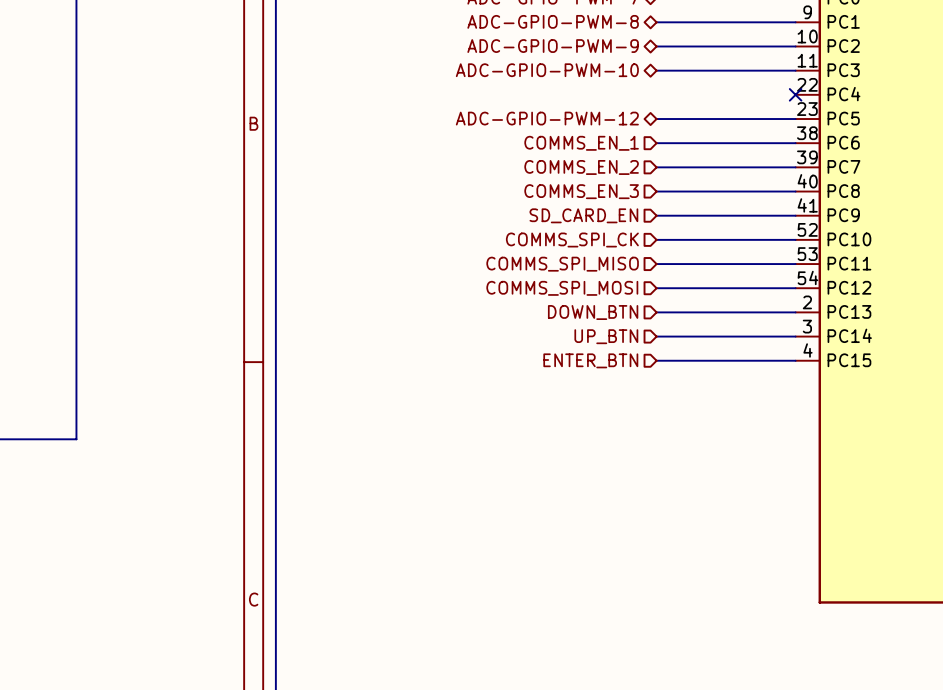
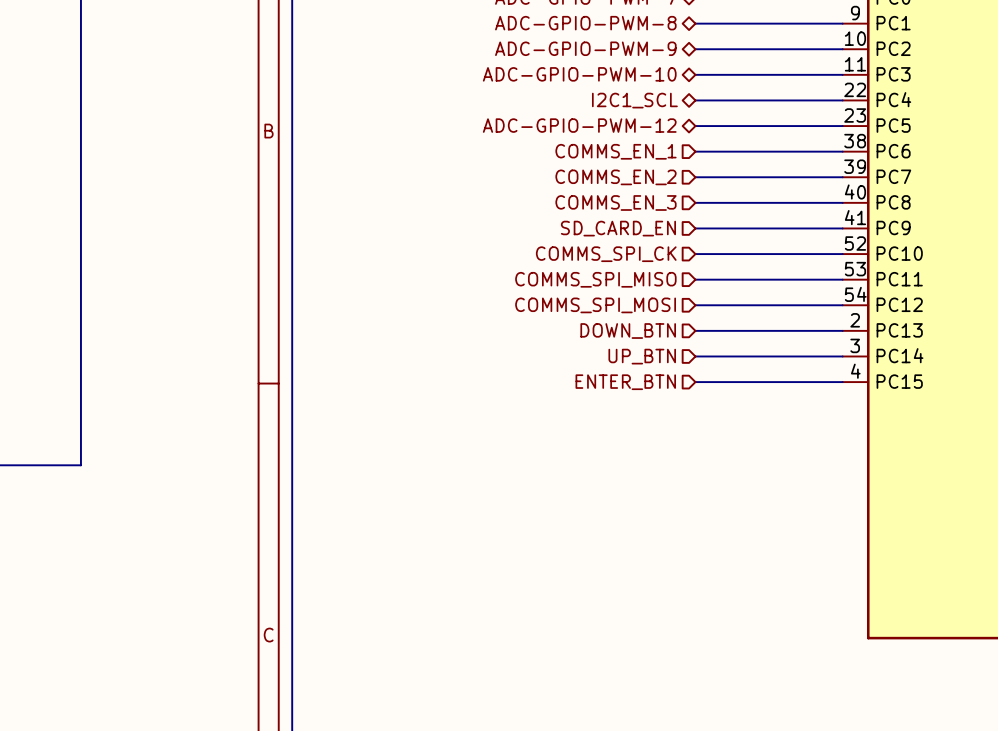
hierarchical label: none -> I2C1_SCL (634, 100)
wire: none -> (695, 100) (842, 100)
no-connect mark: (795, 94) -> none

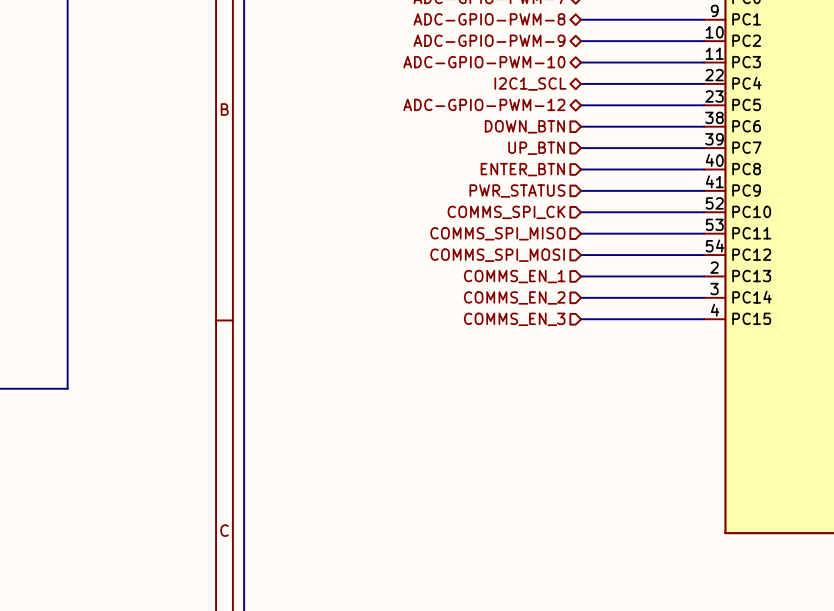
hierarchical label: COMMS_EN_1 (616, 151) -> DOWN_BTN (524, 126)
hierarchical label: COMMS_EN_2 (616, 177) -> UP_BTN (536, 148)
hierarchical label: COMMS_EN_3 (616, 202) -> ENTER_BTN (522, 169)
hierarchical label: SD_CARD_EN (618, 228) -> PWR_STATUS (517, 190)
hierarchical label: DOWN_BTN (628, 331) -> COMMS_EN_1 (514, 276)
hierarchical label: UP_BTN (642, 356) -> COMMS_EN_2 (514, 297)
hierarchical label: ENTER_BTN (625, 382) -> COMMS_EN_3 (514, 319)

